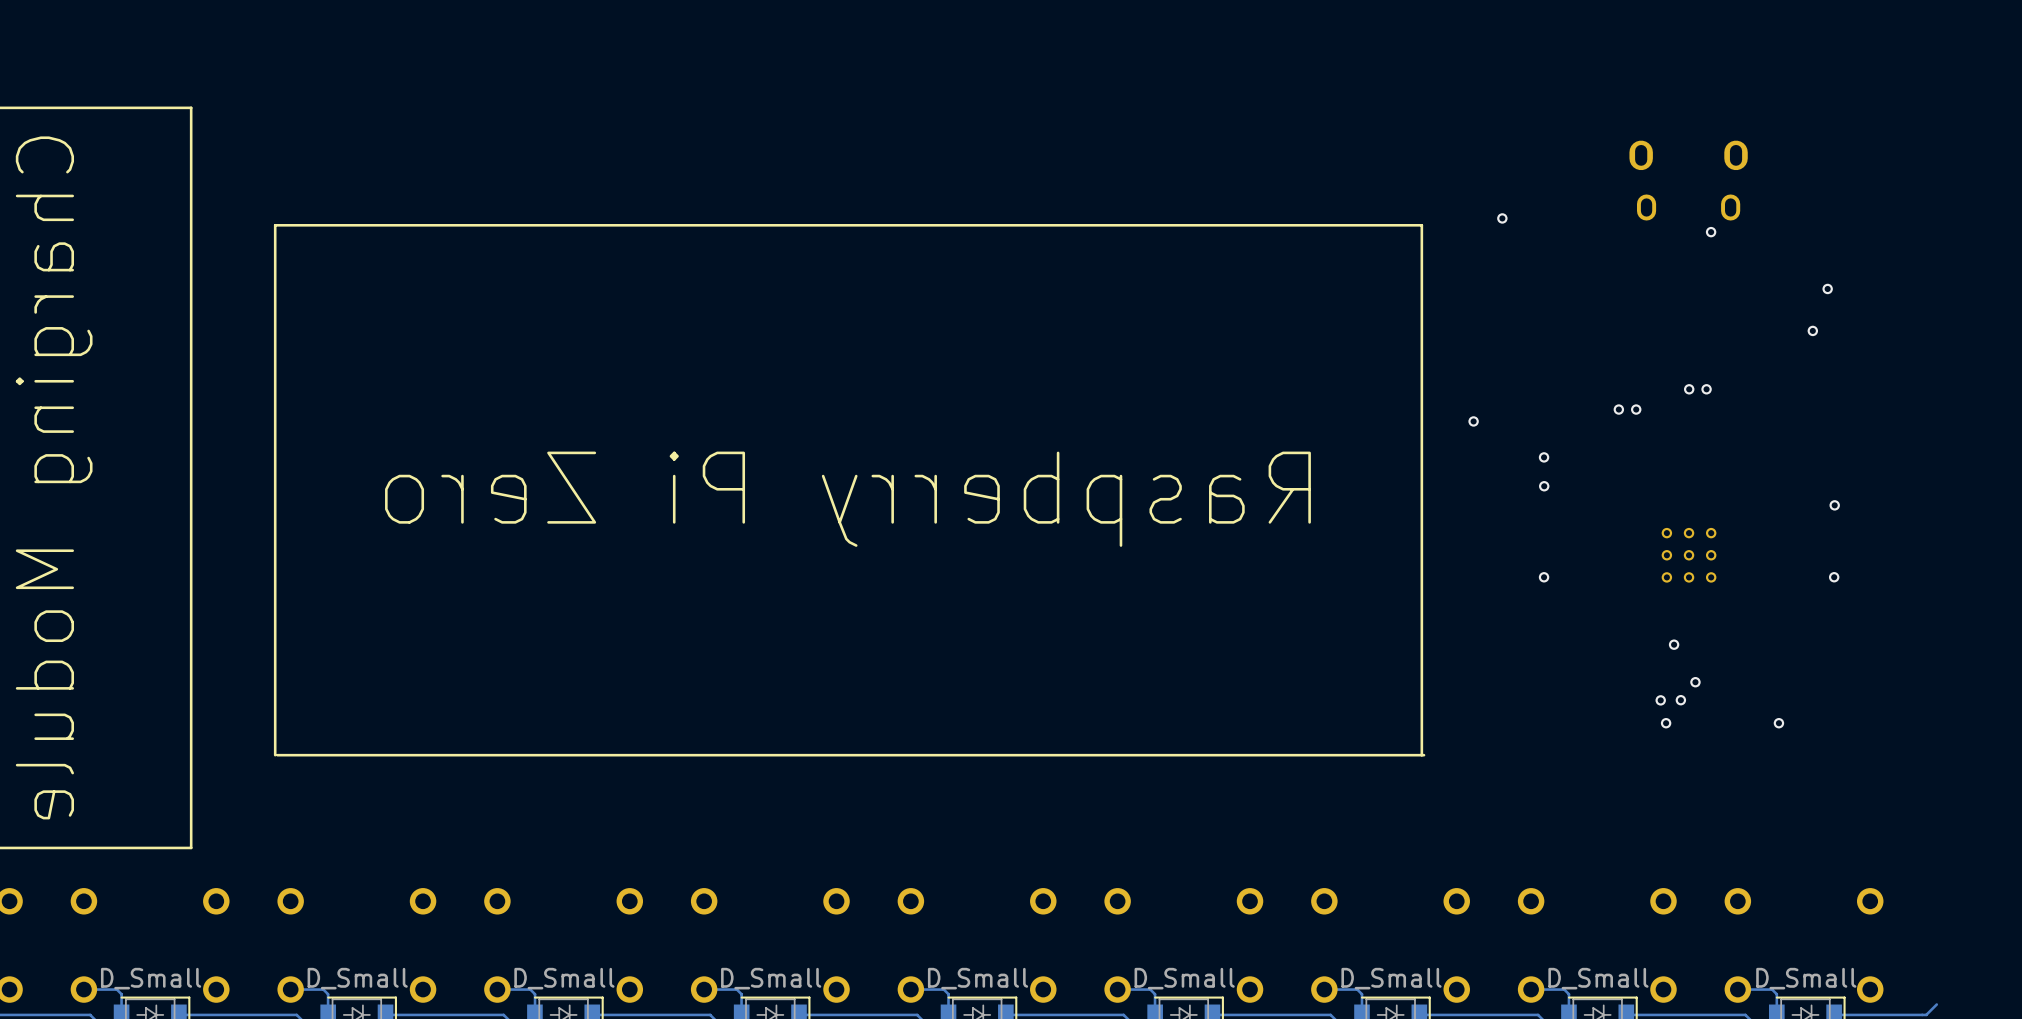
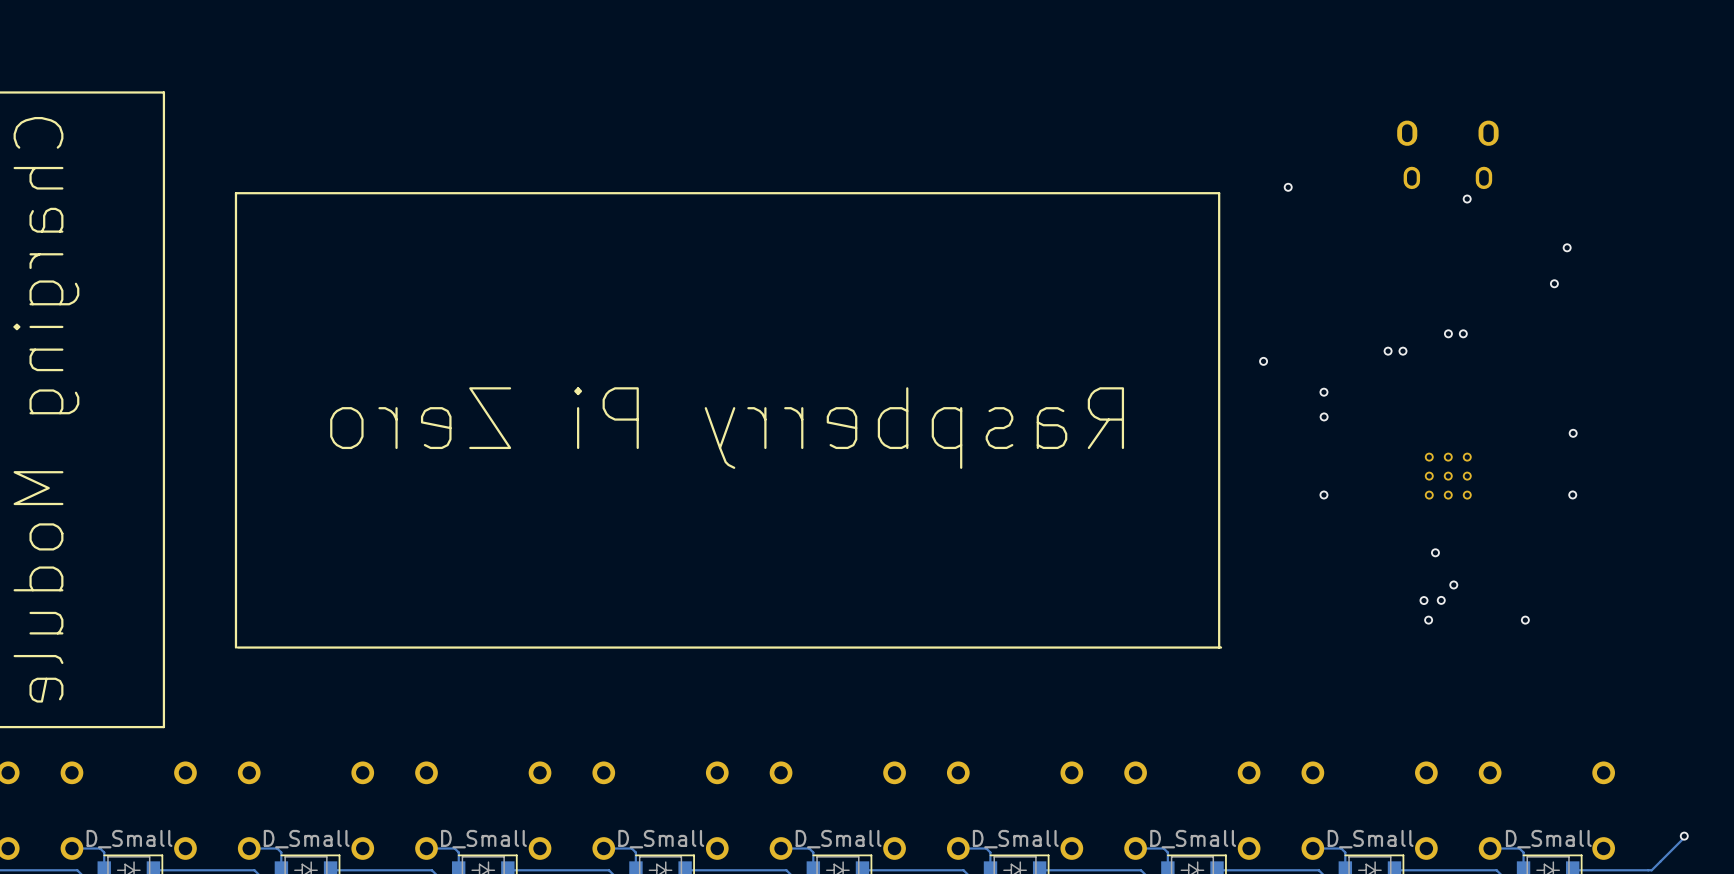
track: none -> (1684, 836) (1660, 861)
via: none -> (1684, 836)

